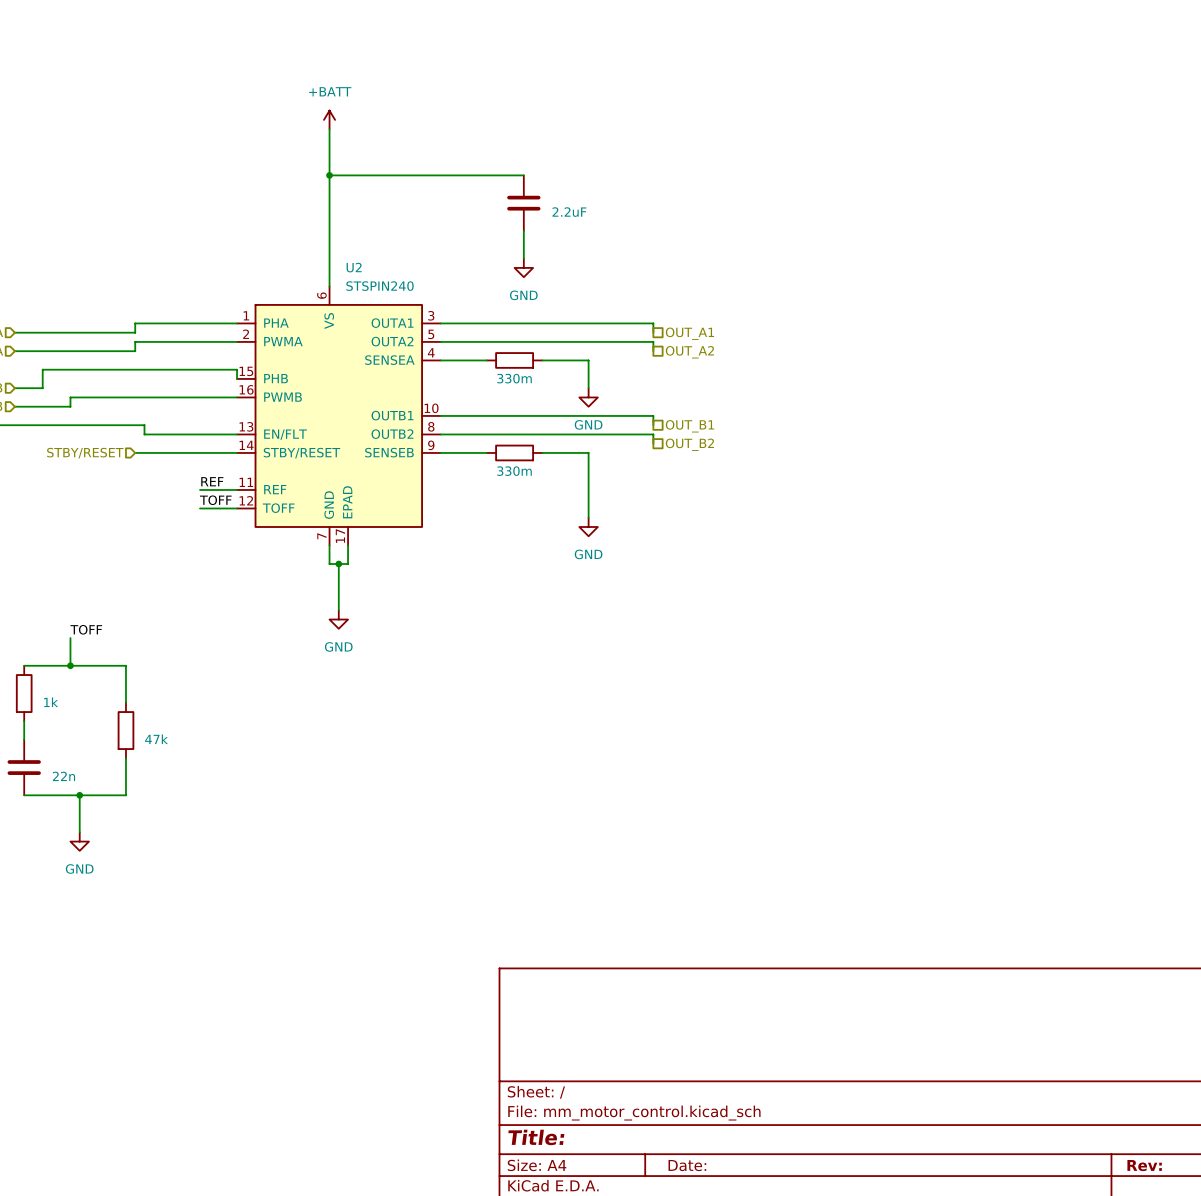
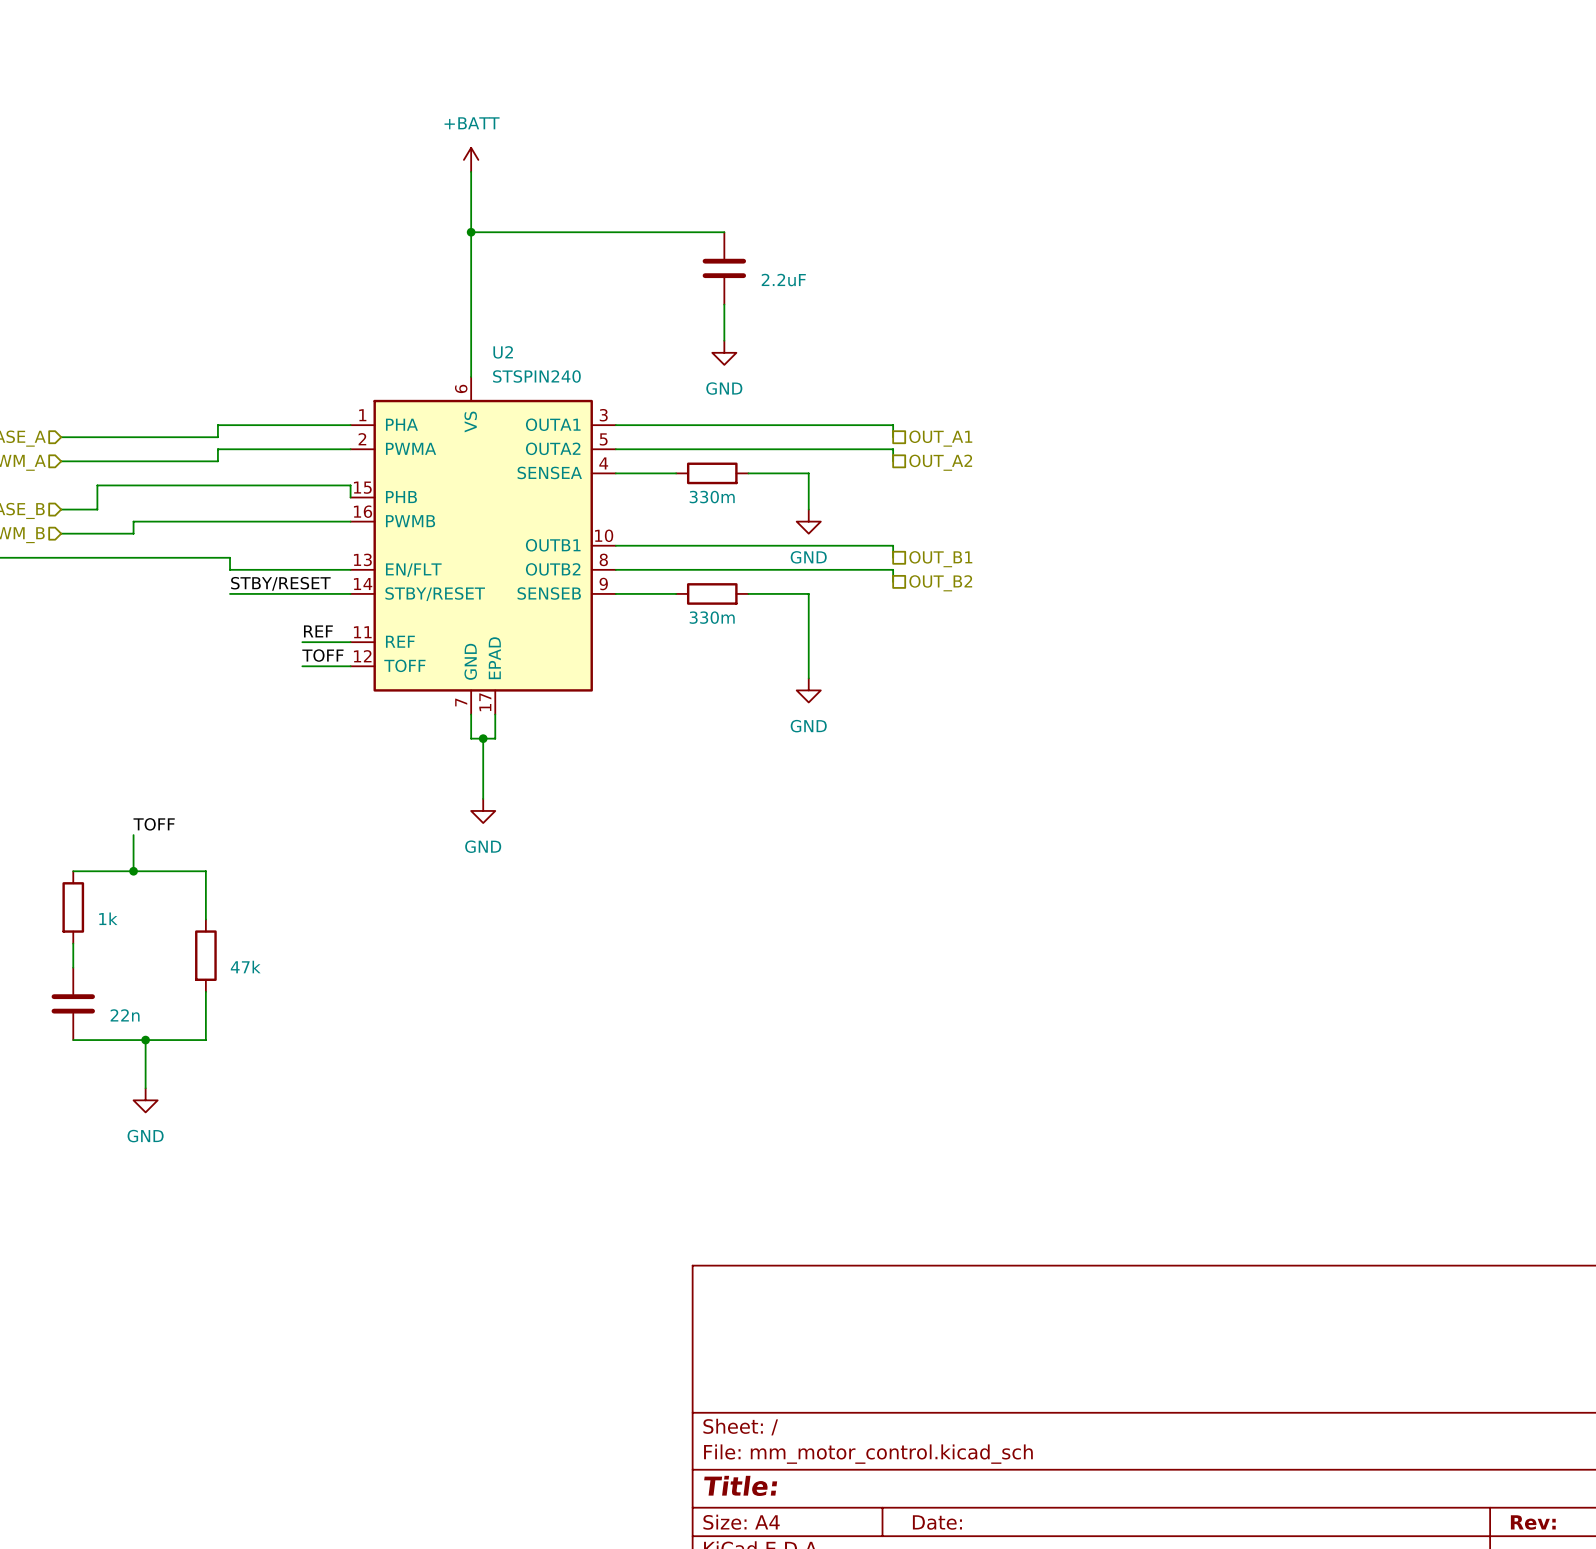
label: none -> STBY/RESET (280, 583)
wire: (135, 452) (144, 452) -> none
hierarchical label: STBY/RESET (85, 453) -> none

